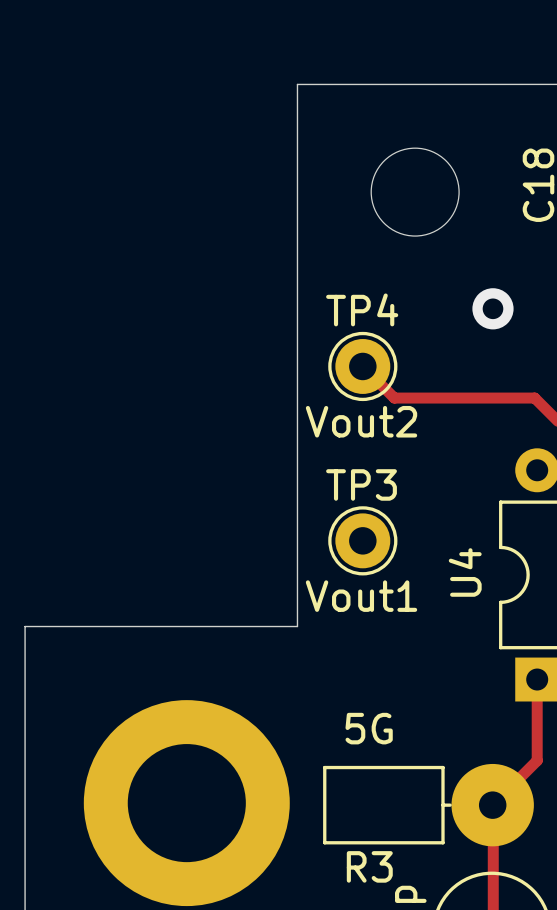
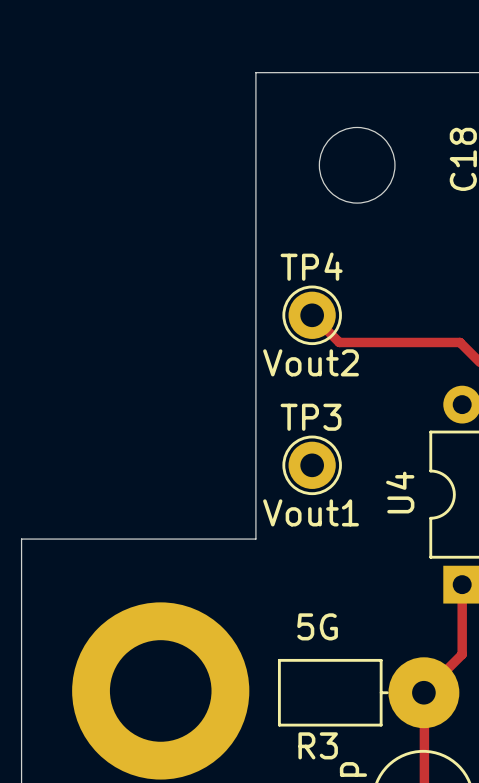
via: (492, 308) -> none

